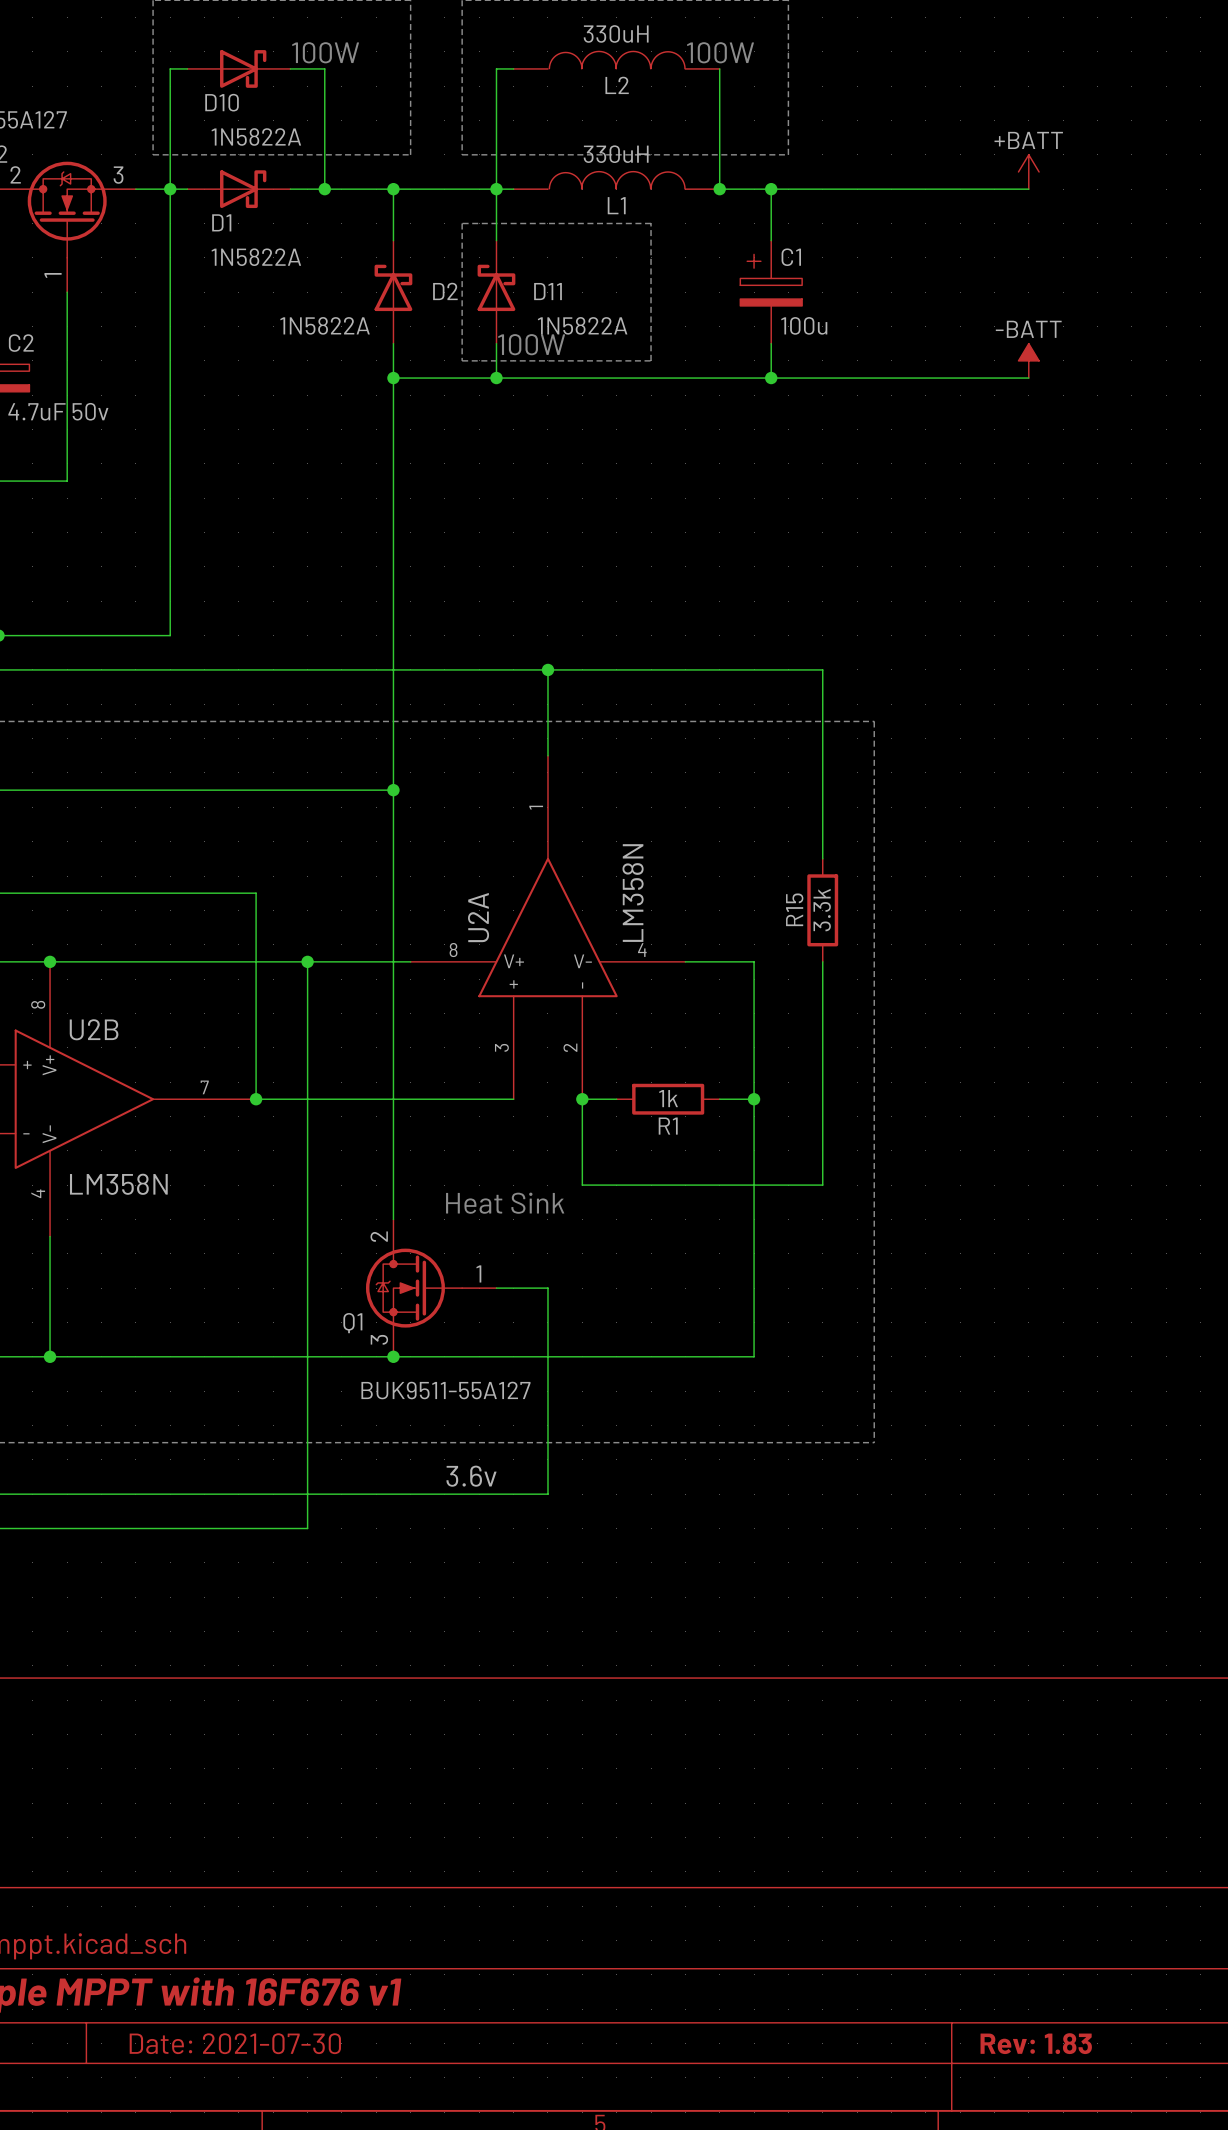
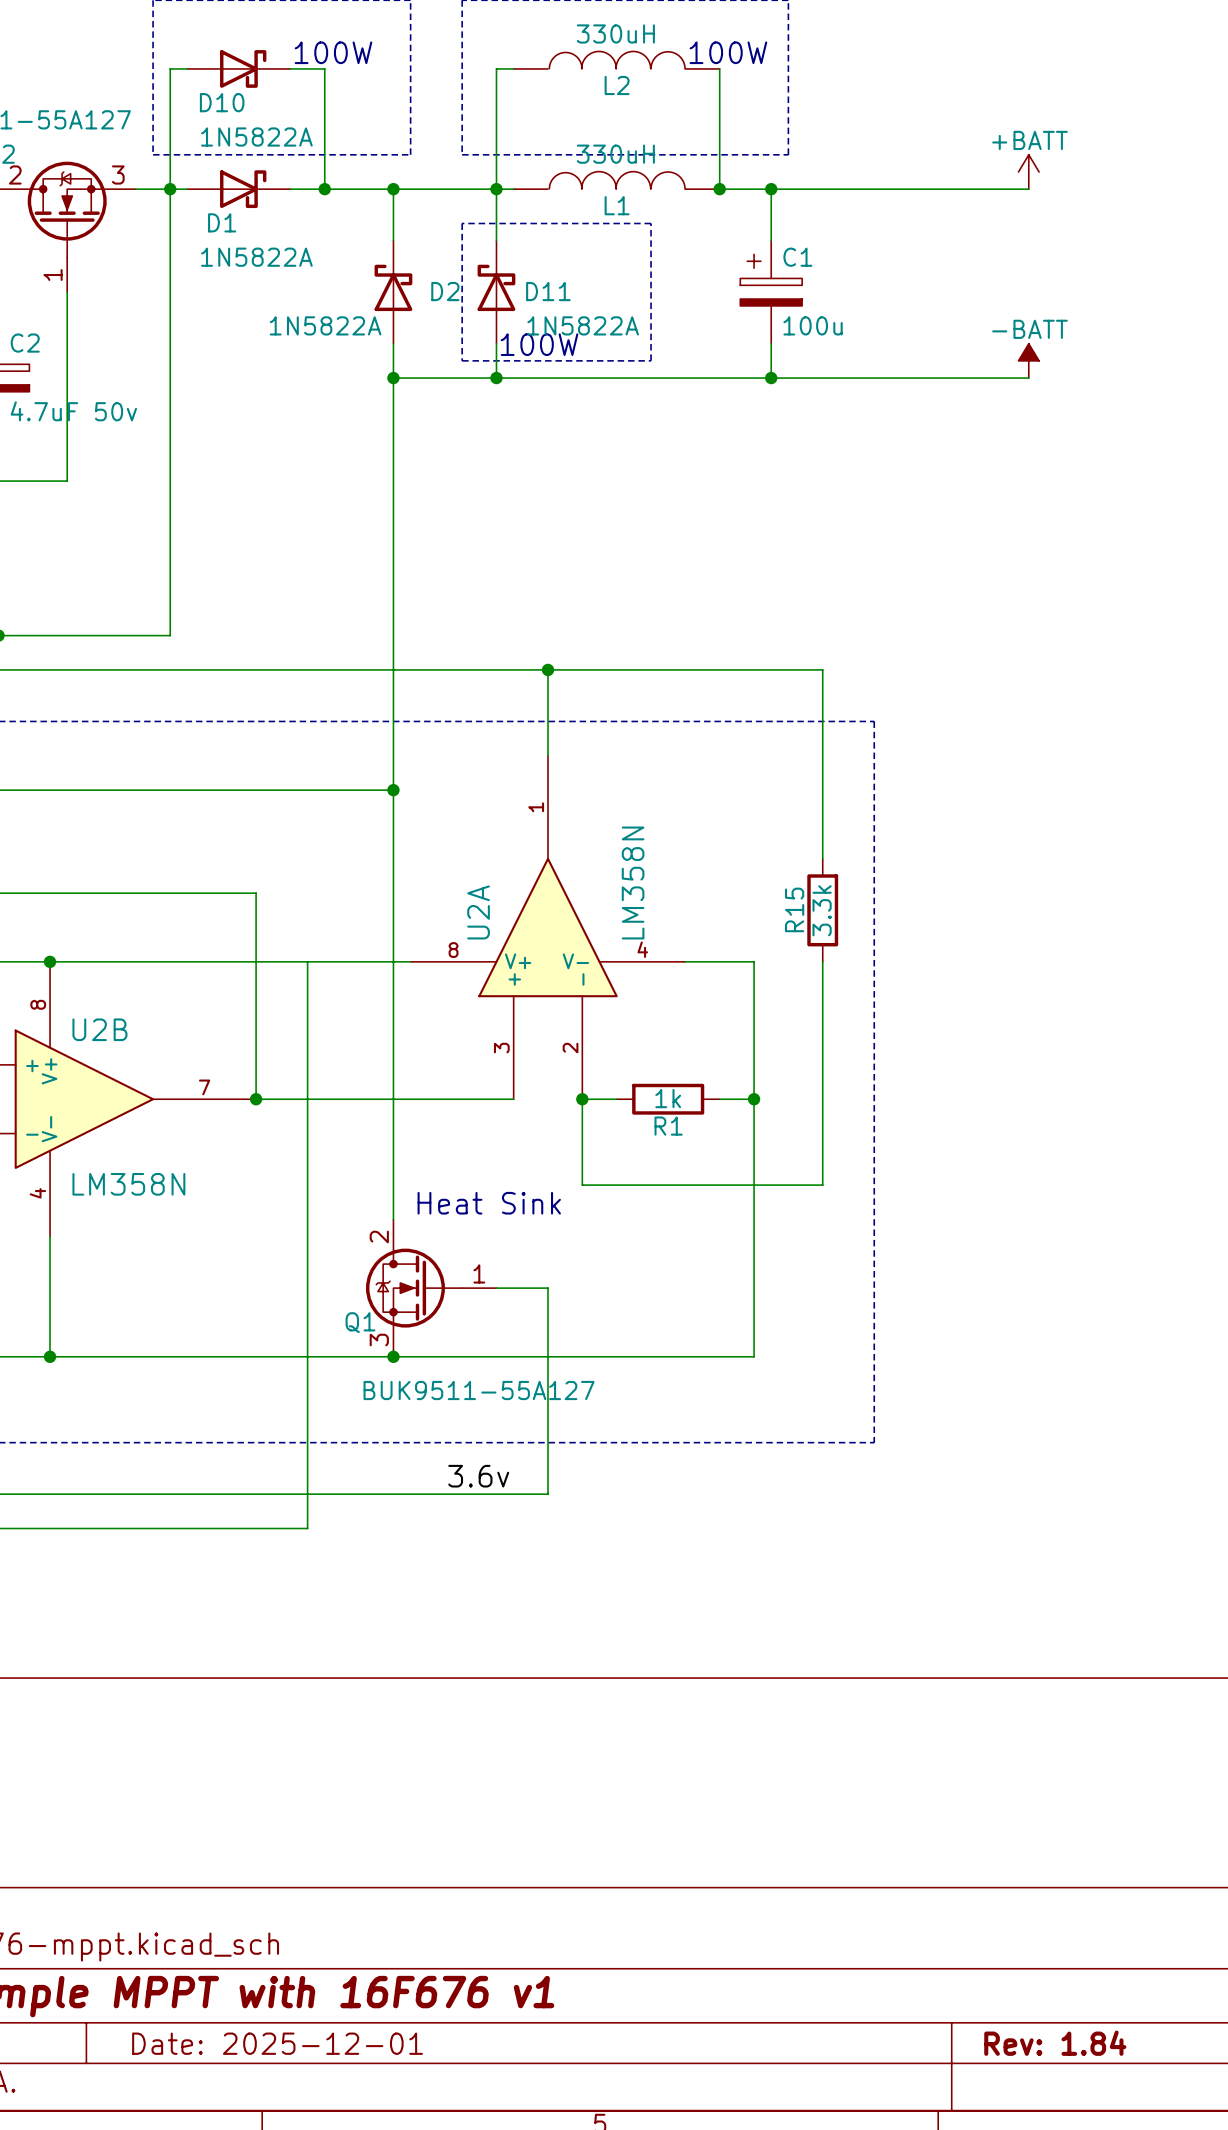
junction: (307, 961) -> none
title block: Date: 2021-07-30 (235, 2043) -> Date: 2025-12-01 (277, 2043)
title block: Rev: 1.83 (1036, 2043) -> Rev: 1.84 (1055, 2043)

